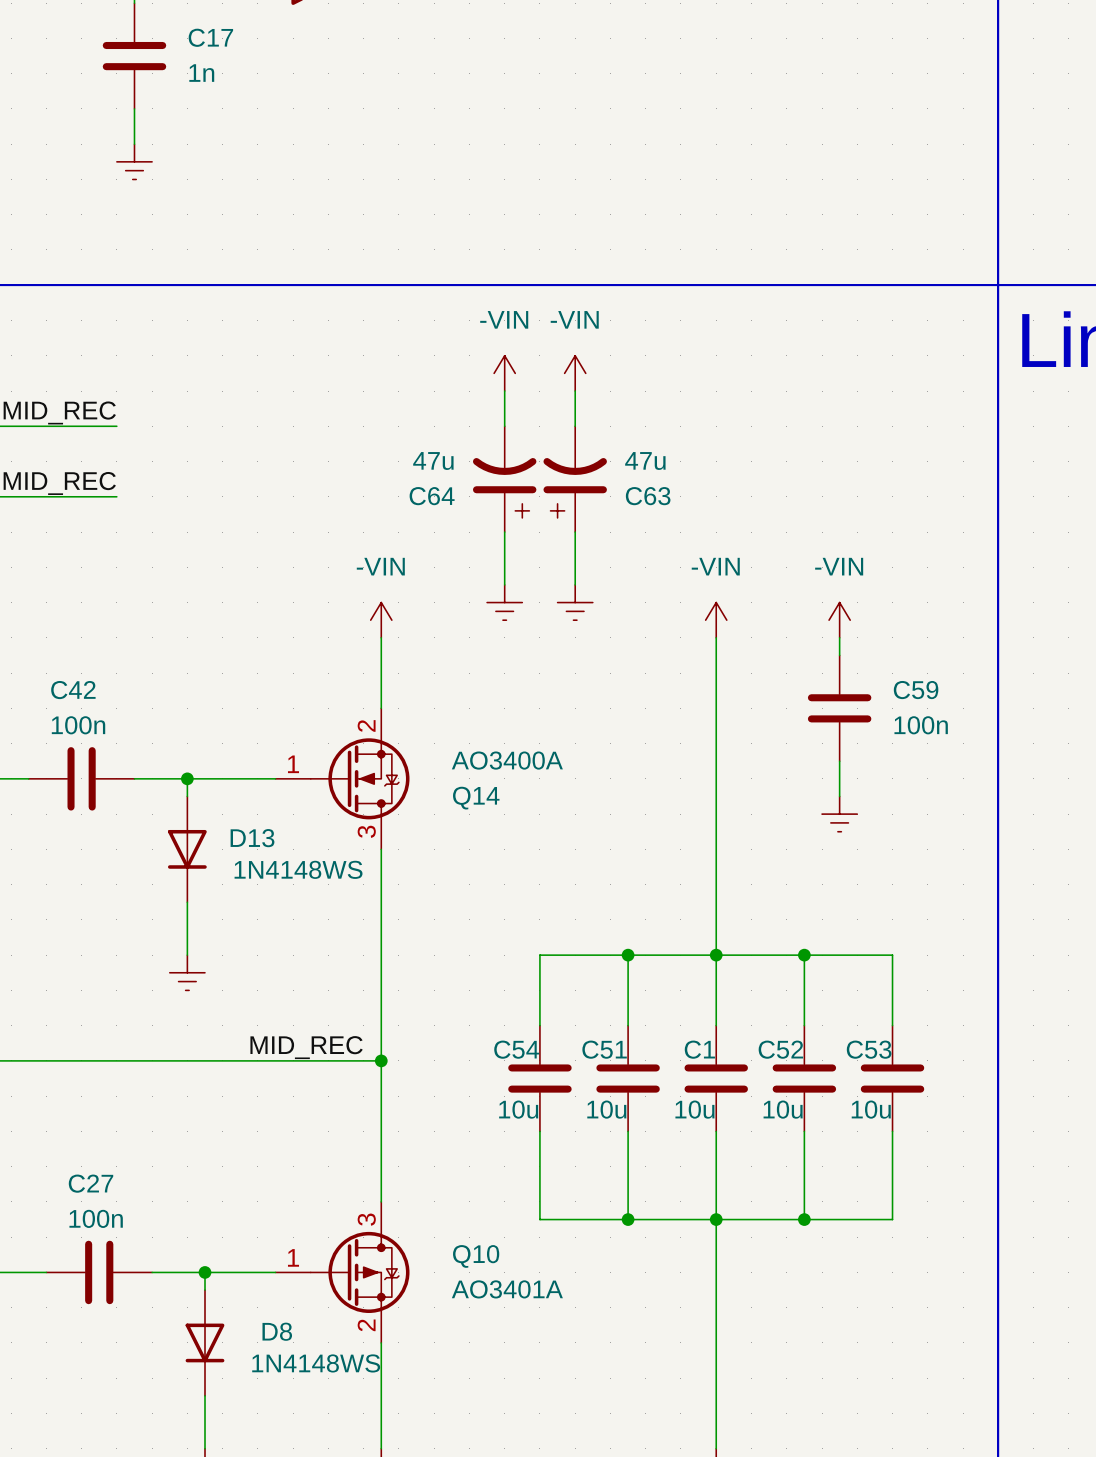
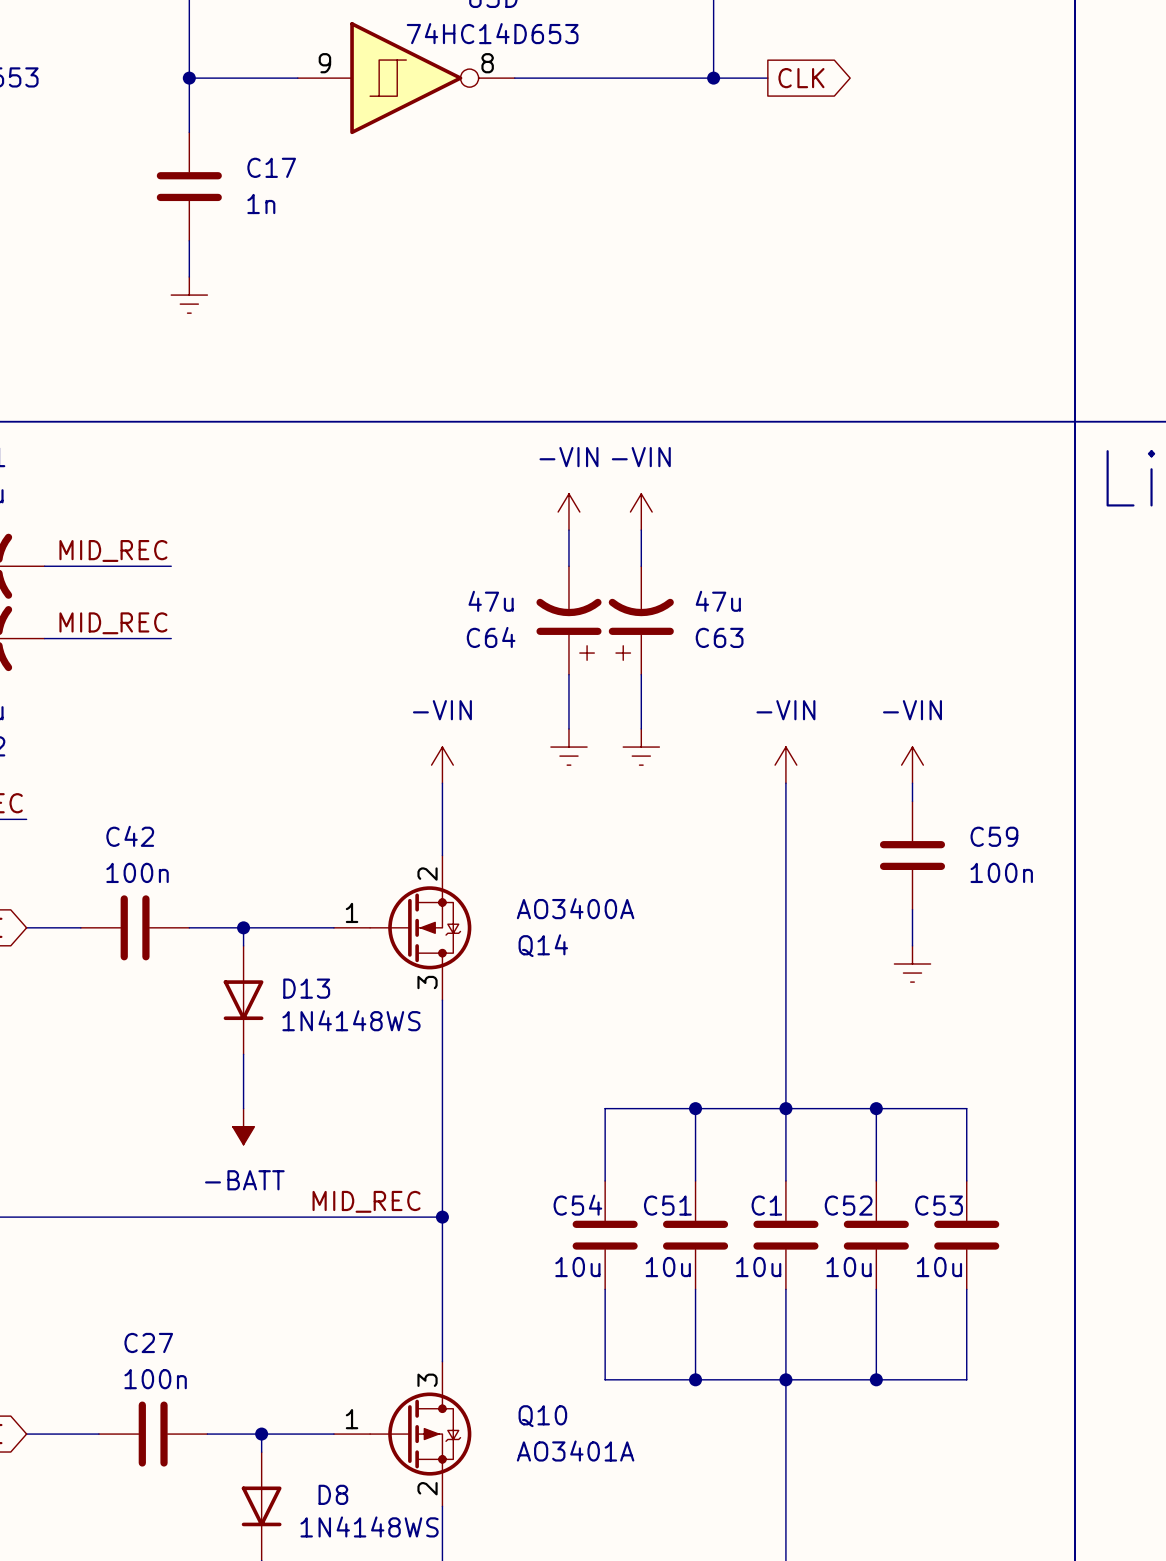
power symbol shape: [169, 955, 206, 991] -> [232, 1108, 255, 1145]
power symbol text: none -> -BATT (244, 1180)

